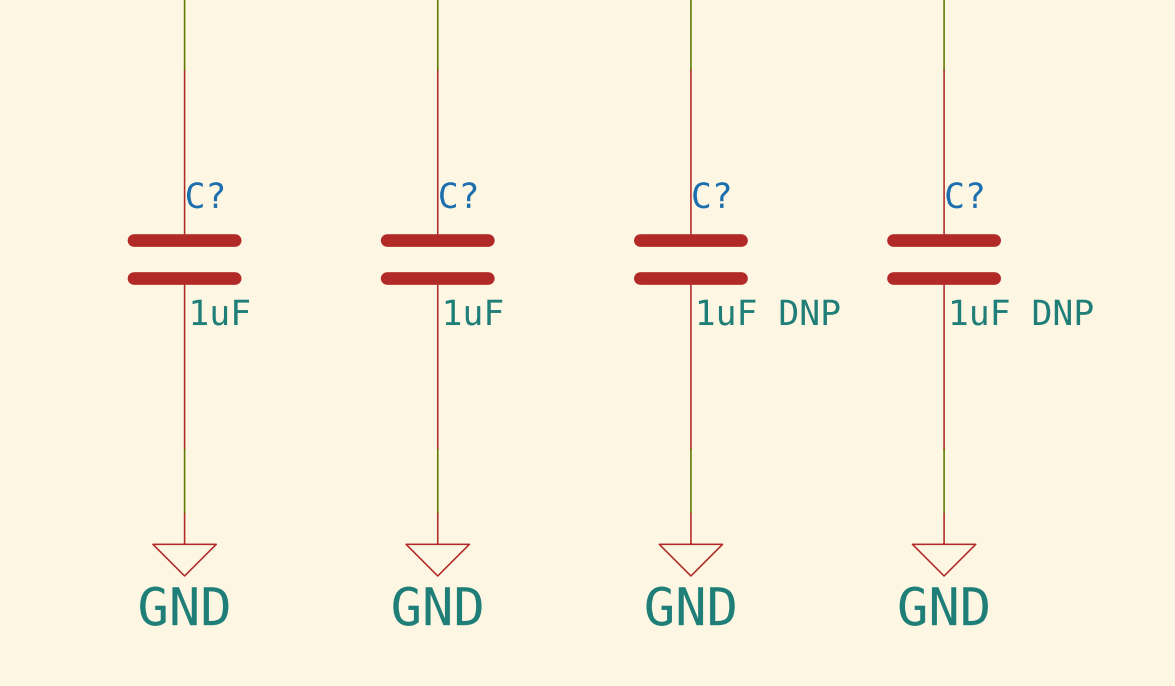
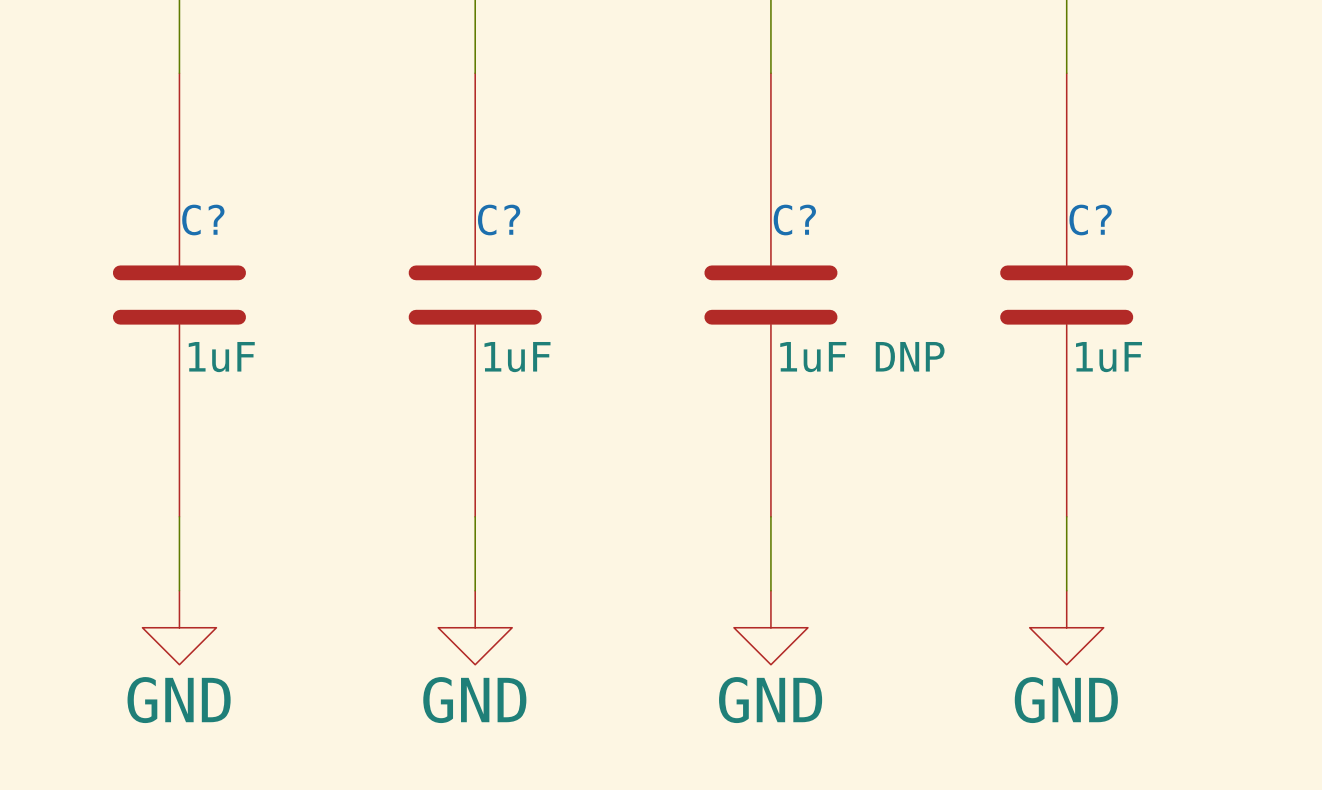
C? value: 1uF DNP (1022, 312) -> 1uF (1109, 357)

